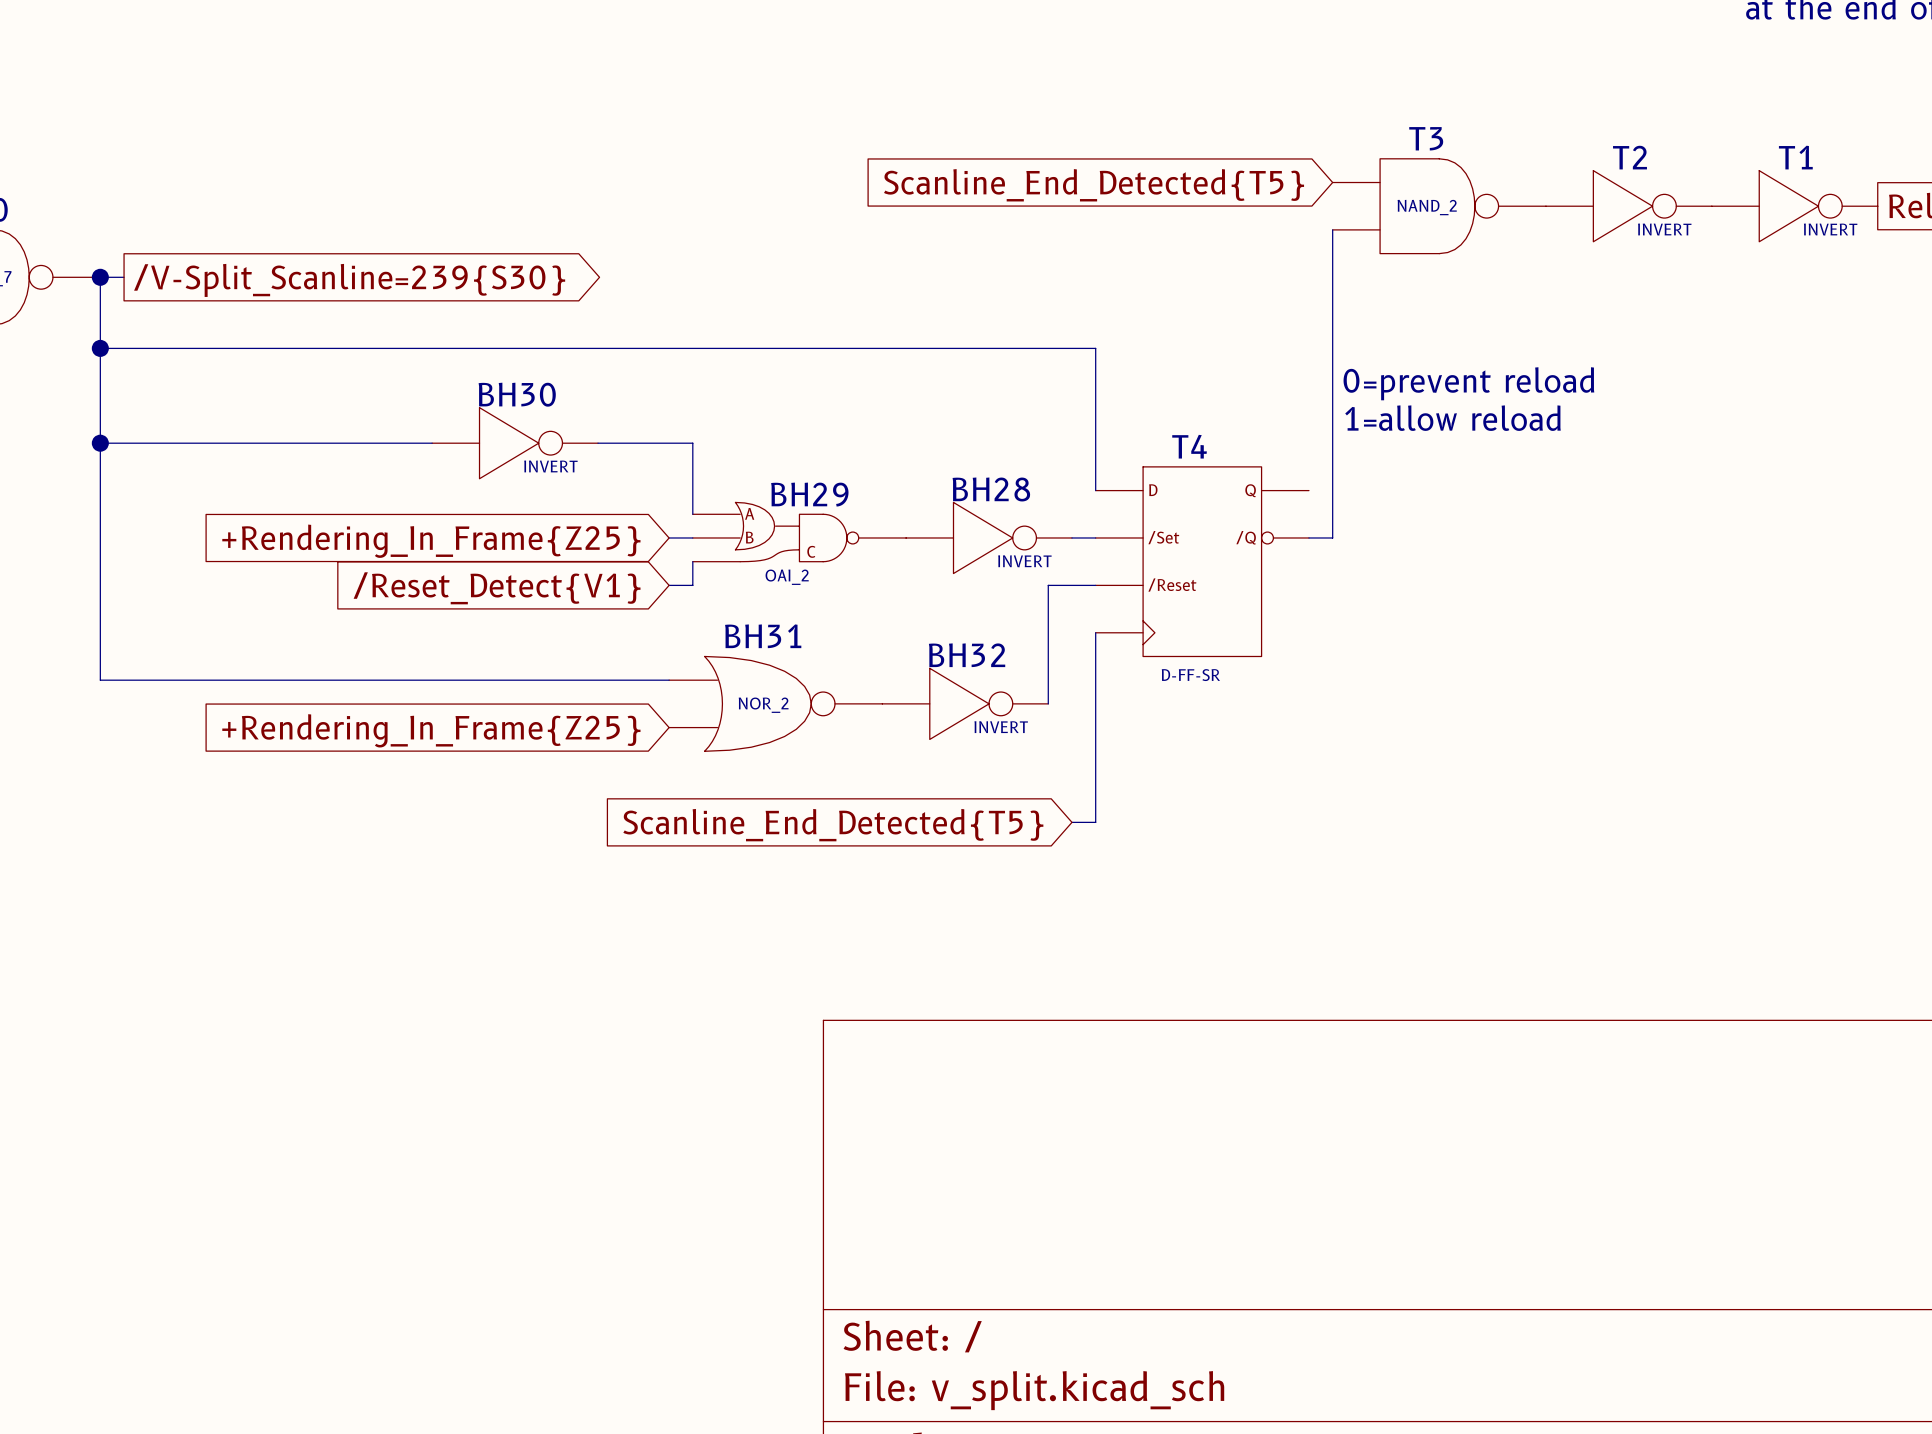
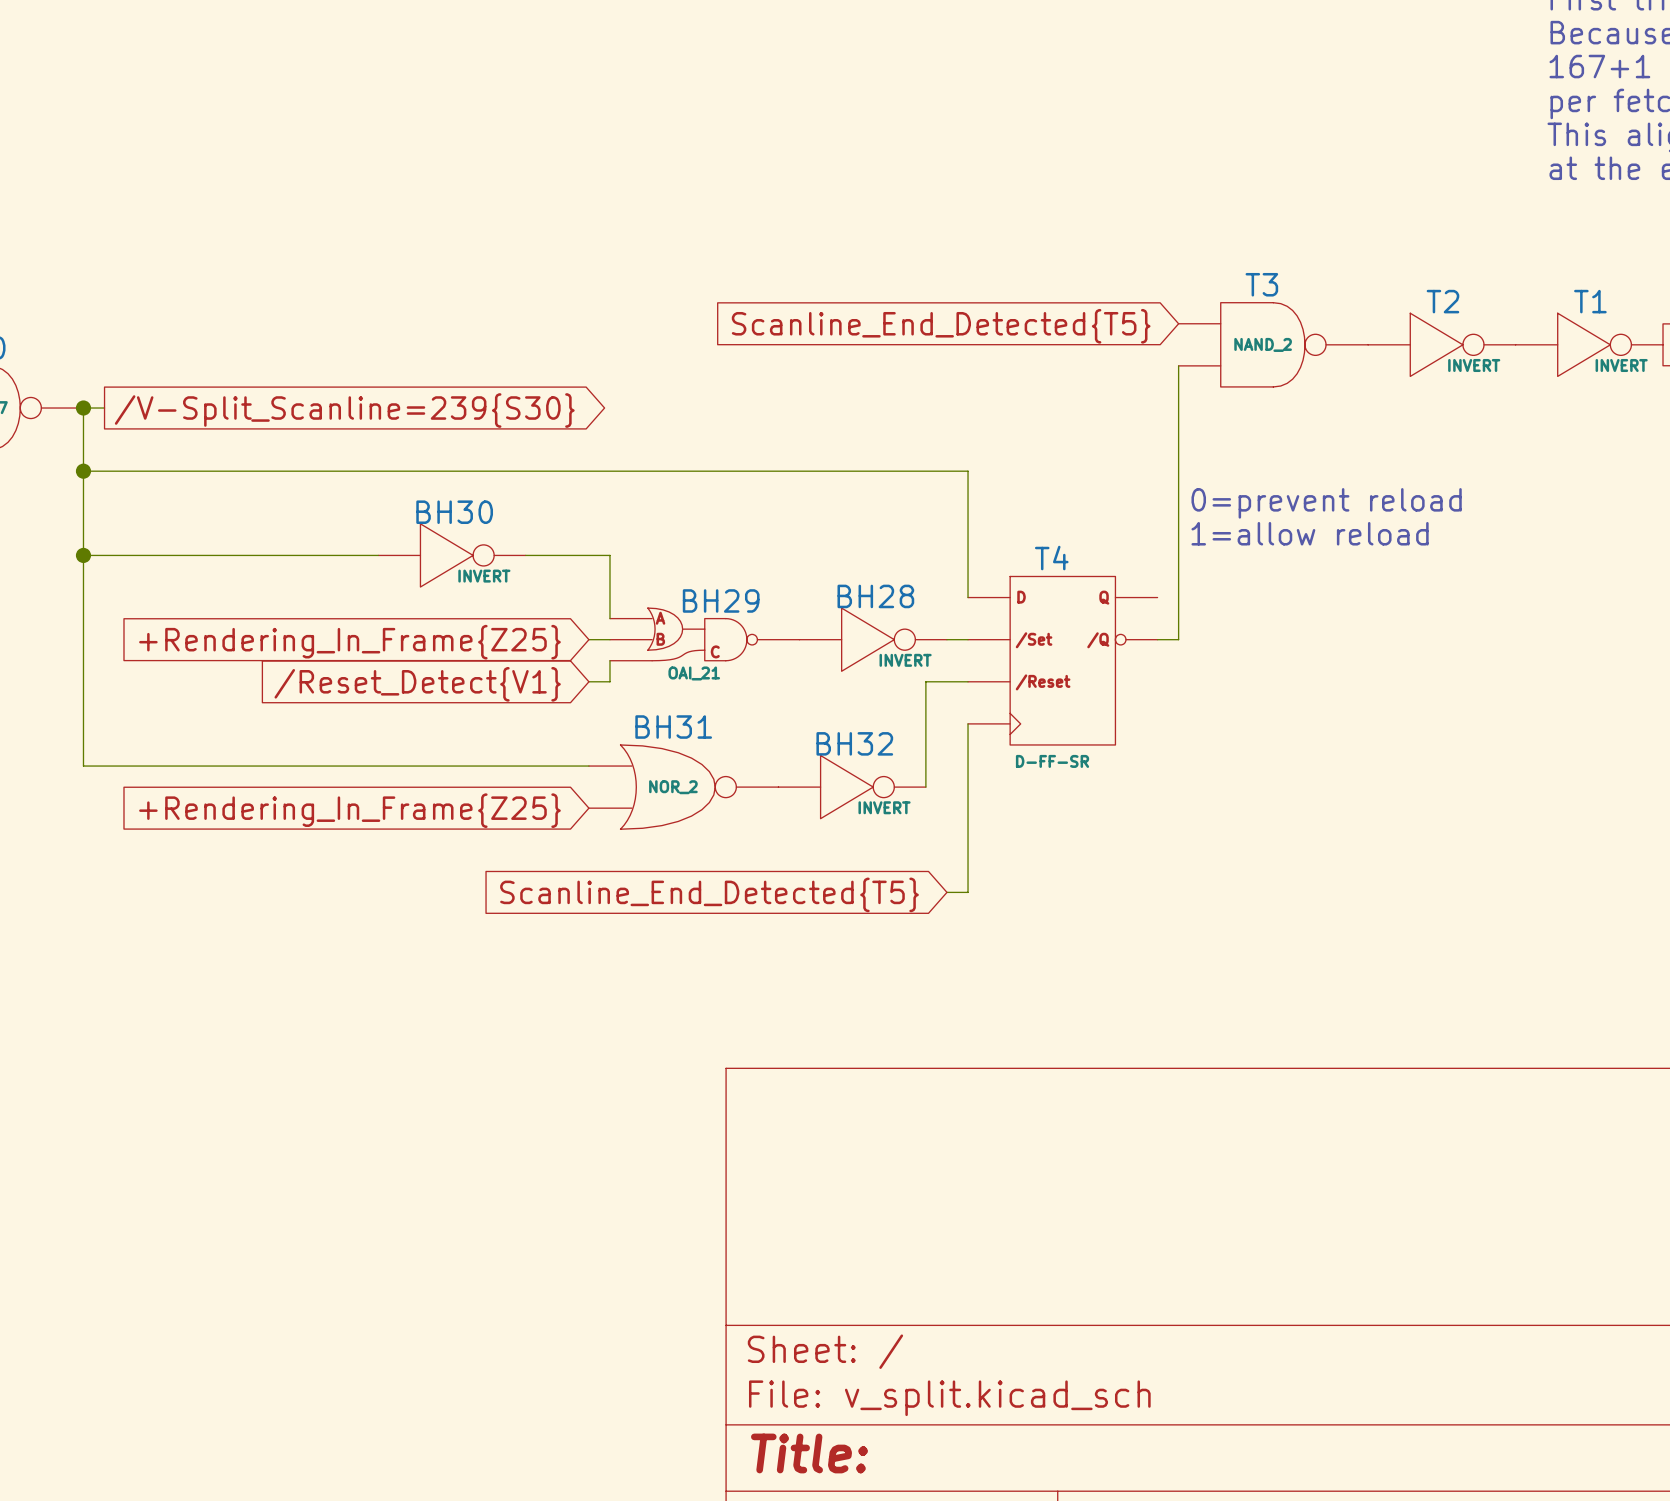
BH29 value: OAI_2 (787, 577) -> OAI_21 (694, 673)

